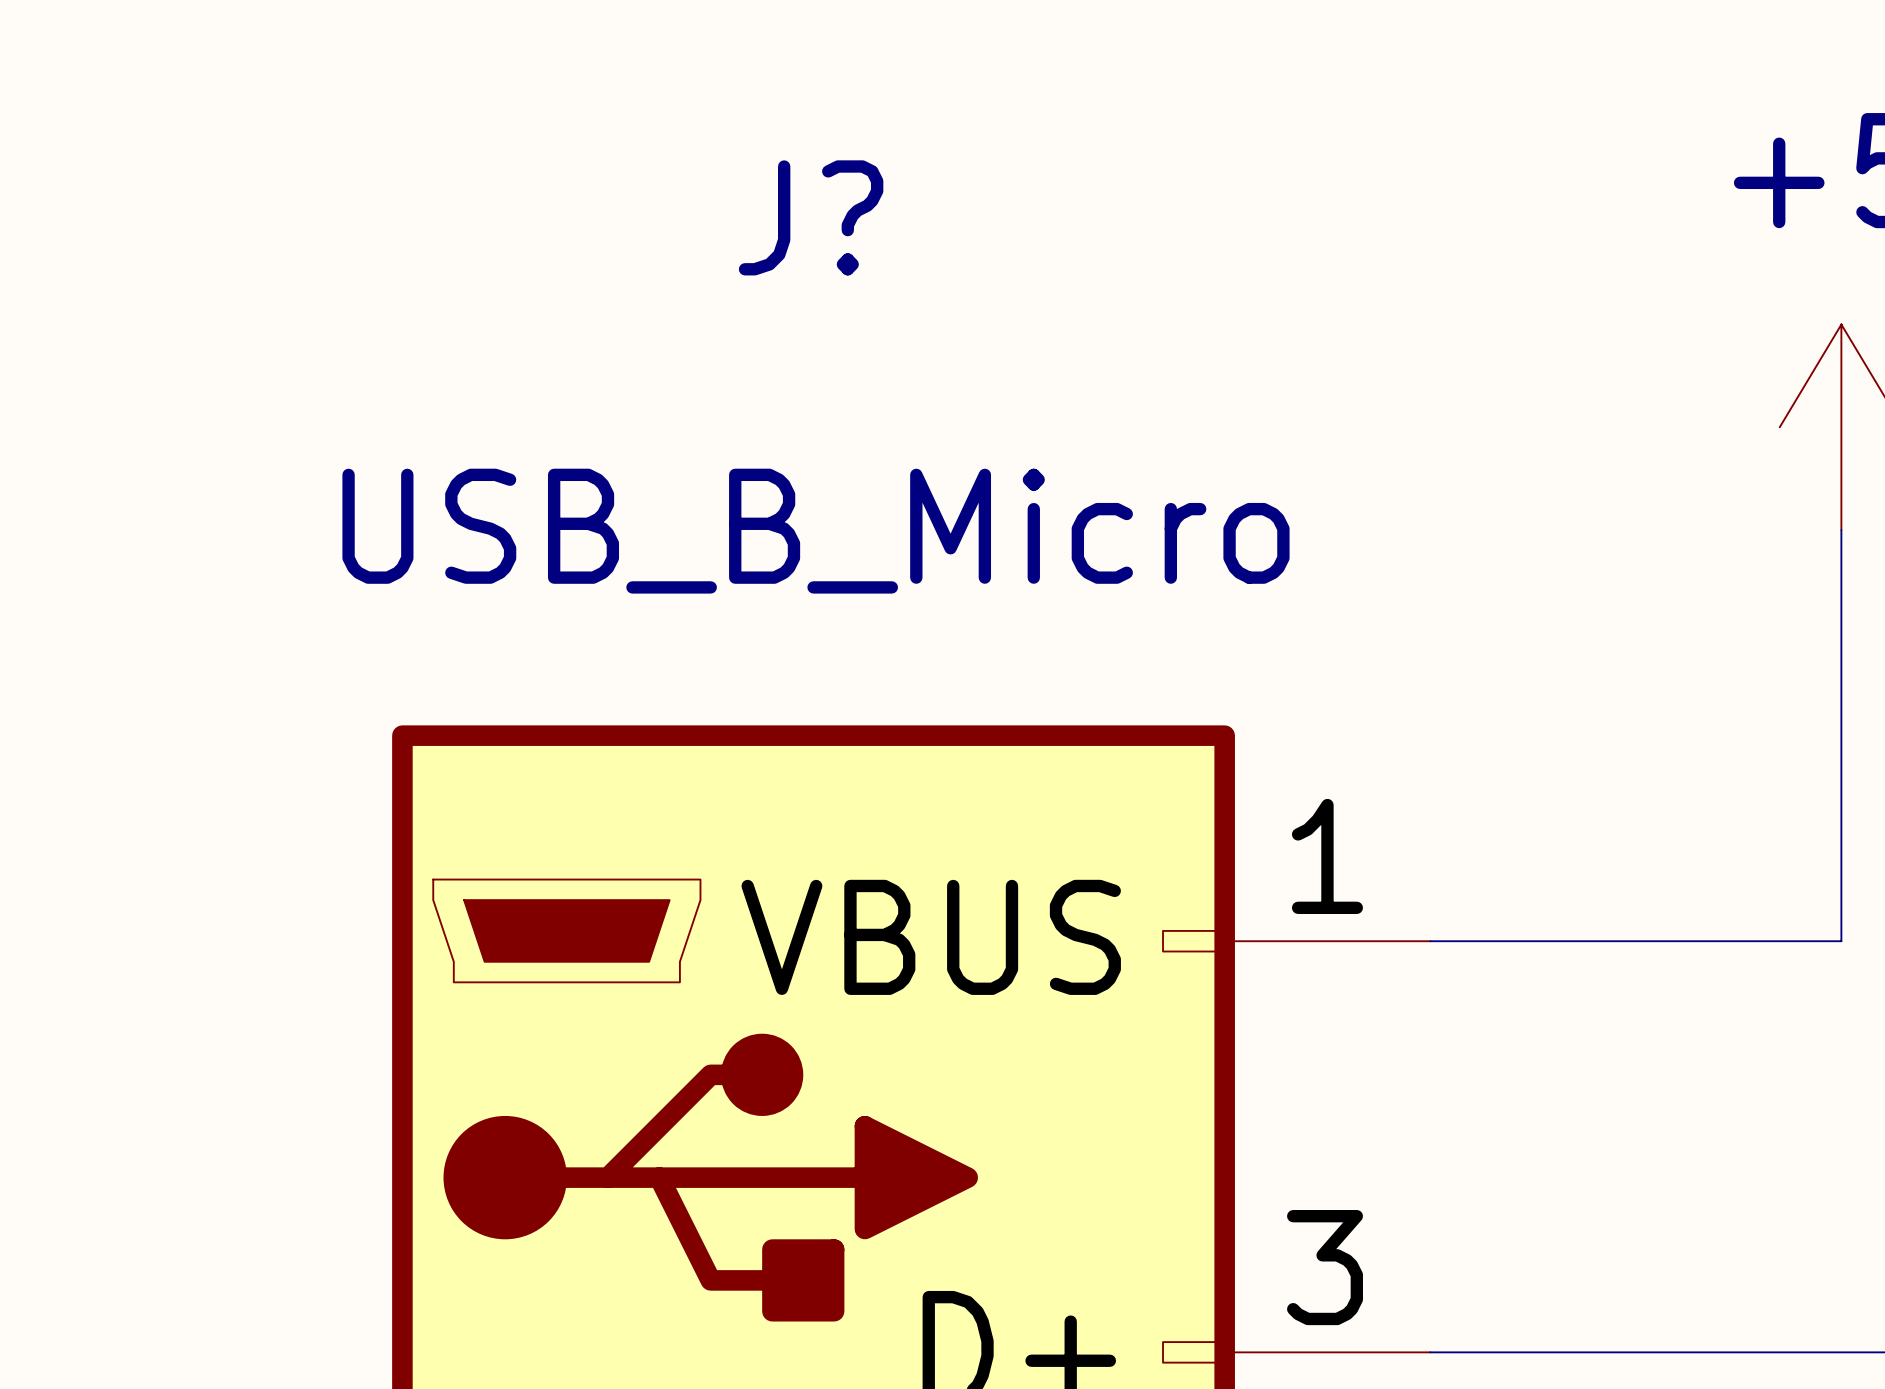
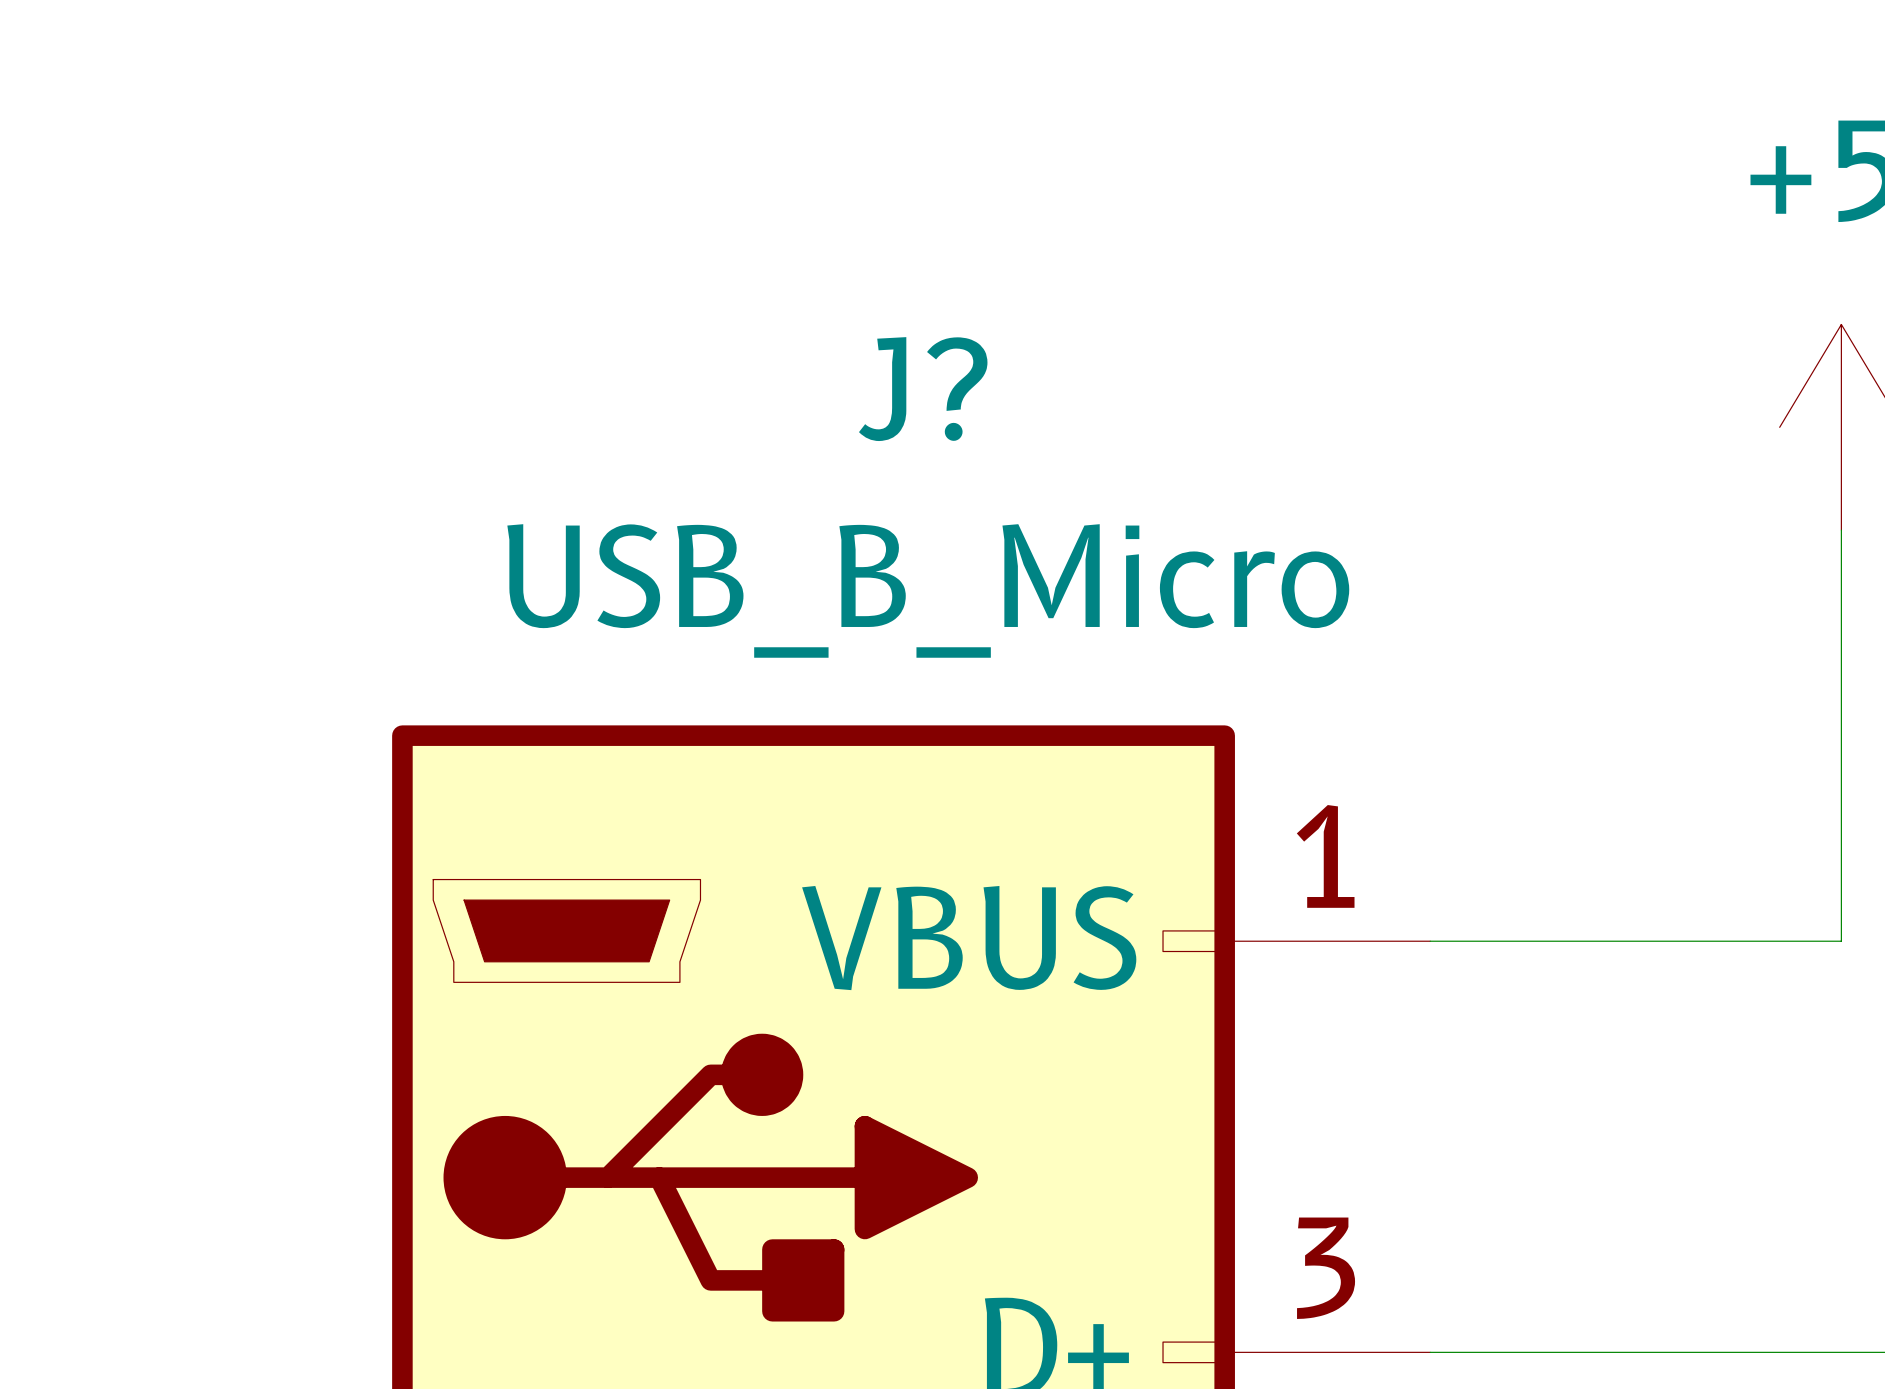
J? name position: J? (811, 217) -> J? (923, 389)
J? value position: USB_B_Micro (815, 531) -> USB_B_Micro (928, 590)

